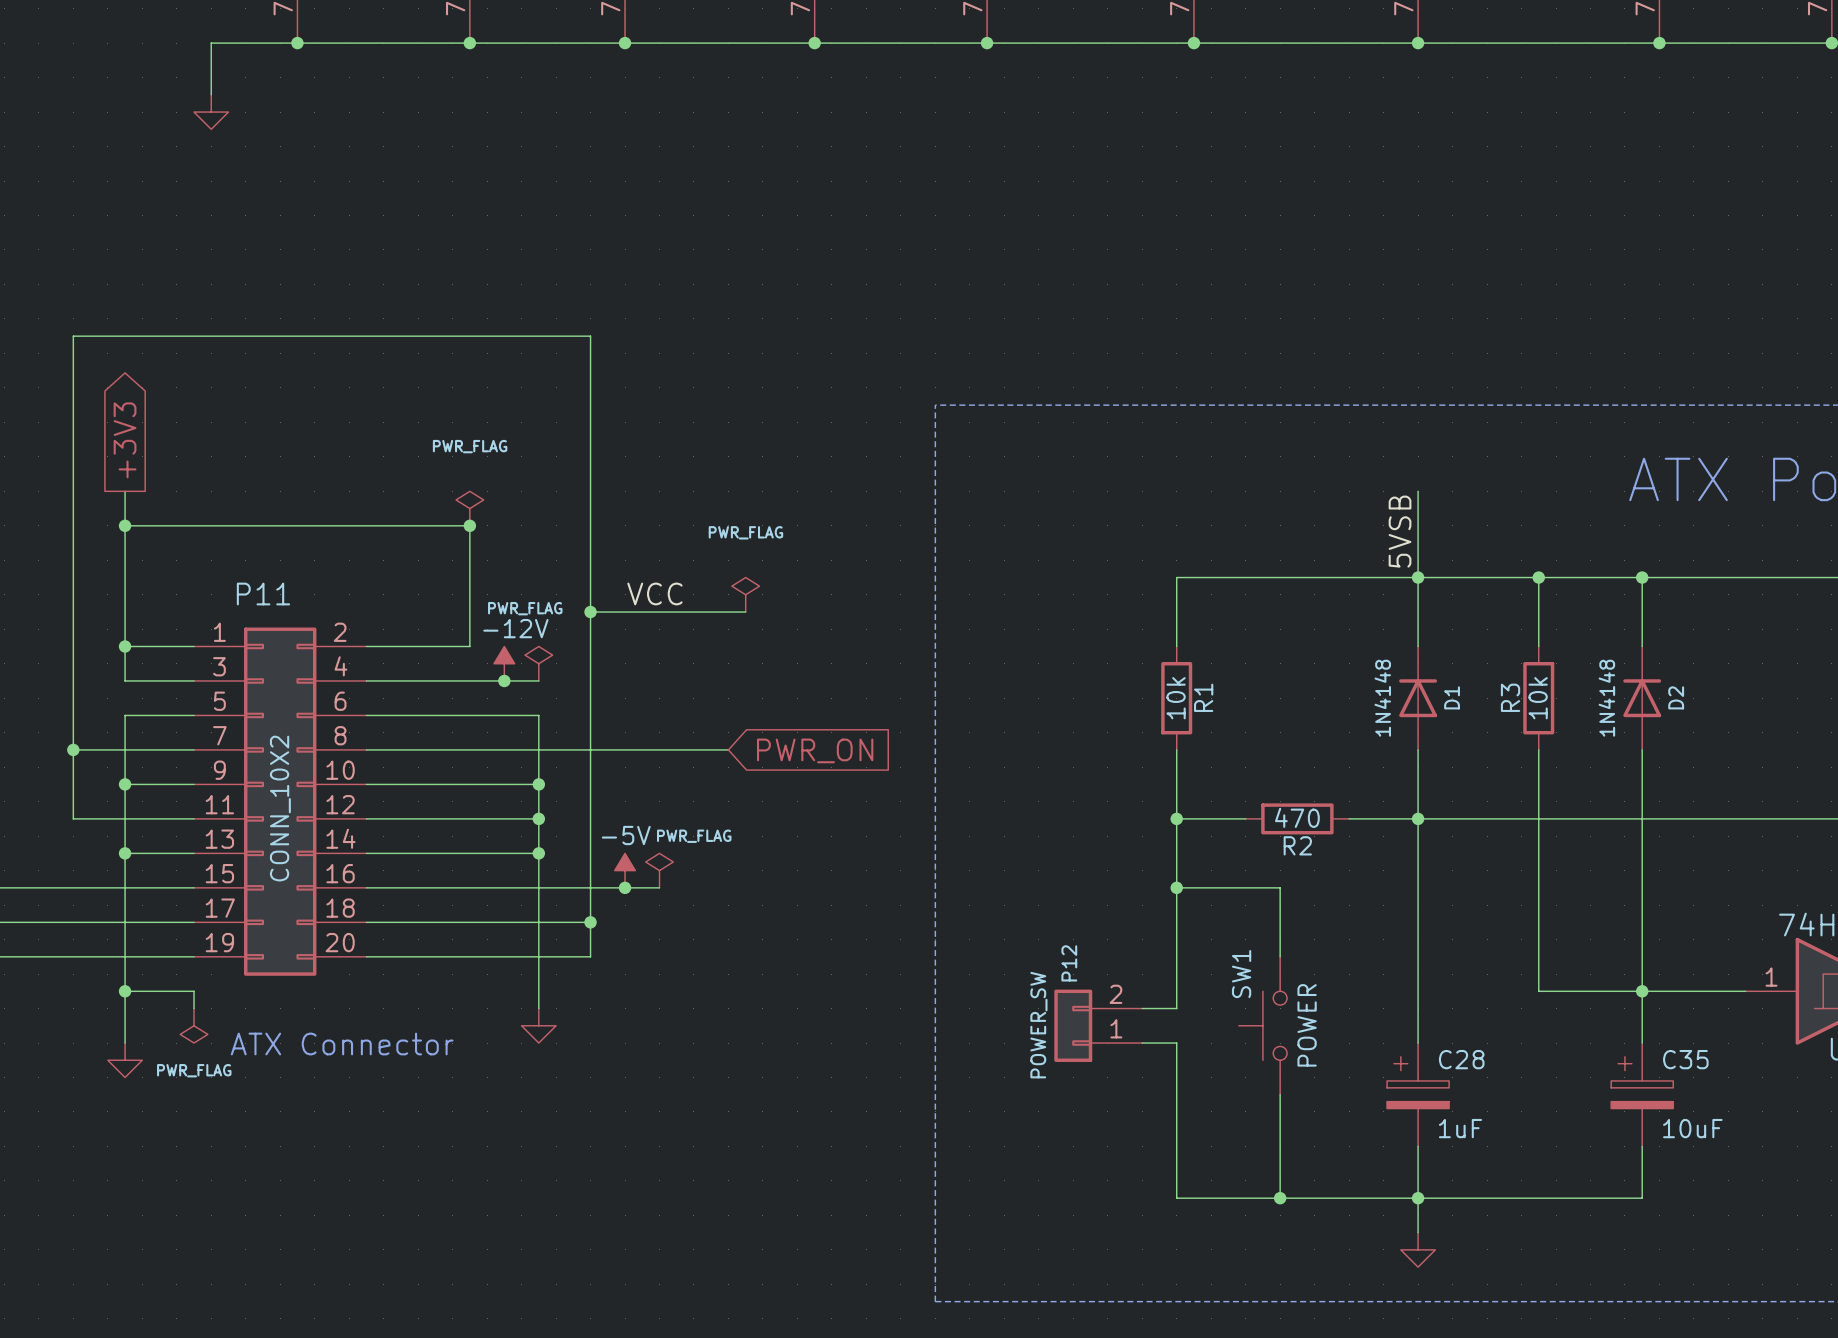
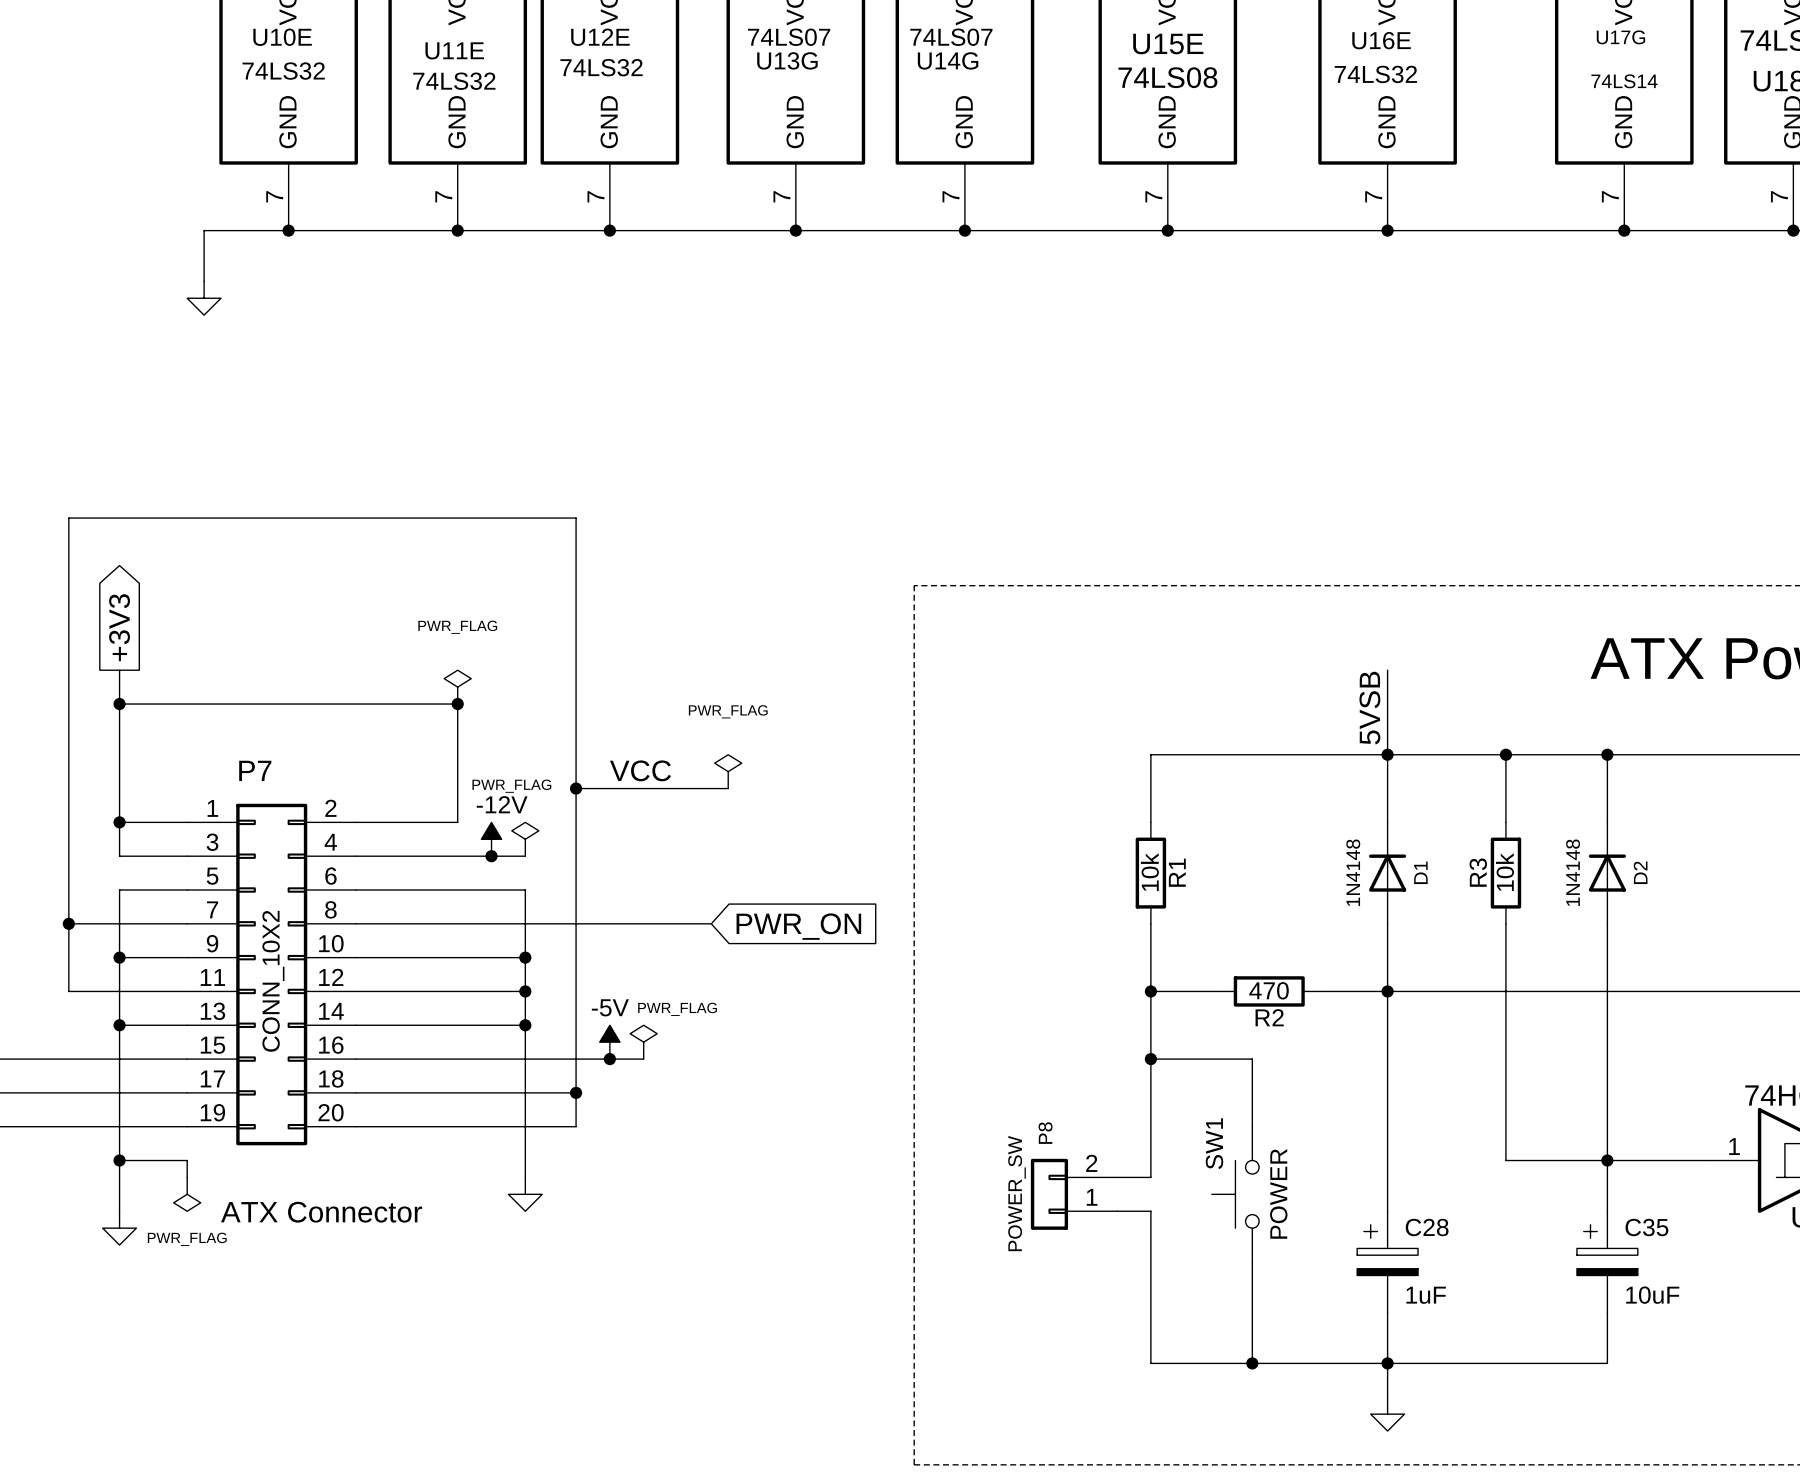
P11 name: P11 (263, 594) -> P7 (255, 770)
P12 name: P12 (1069, 963) -> P8 (1045, 1133)

